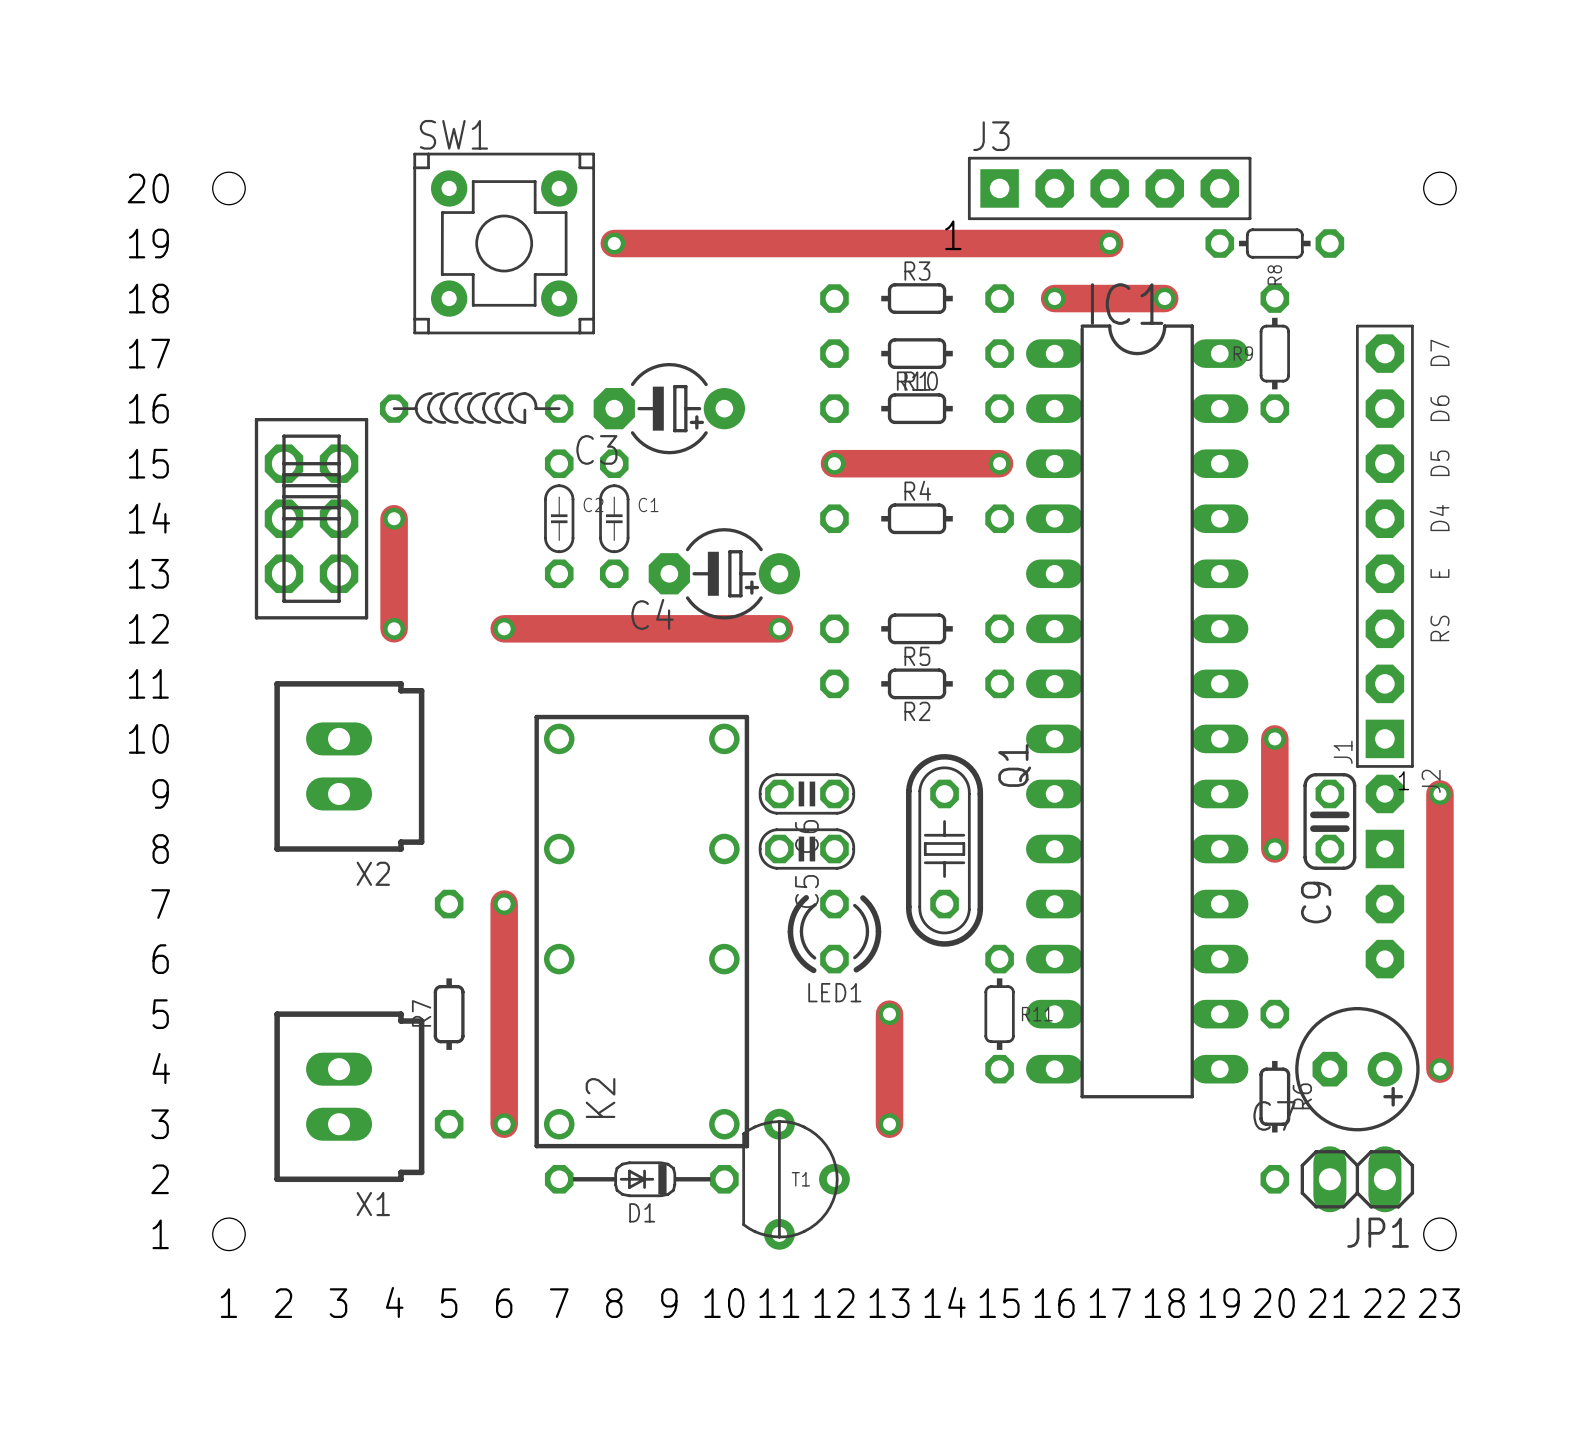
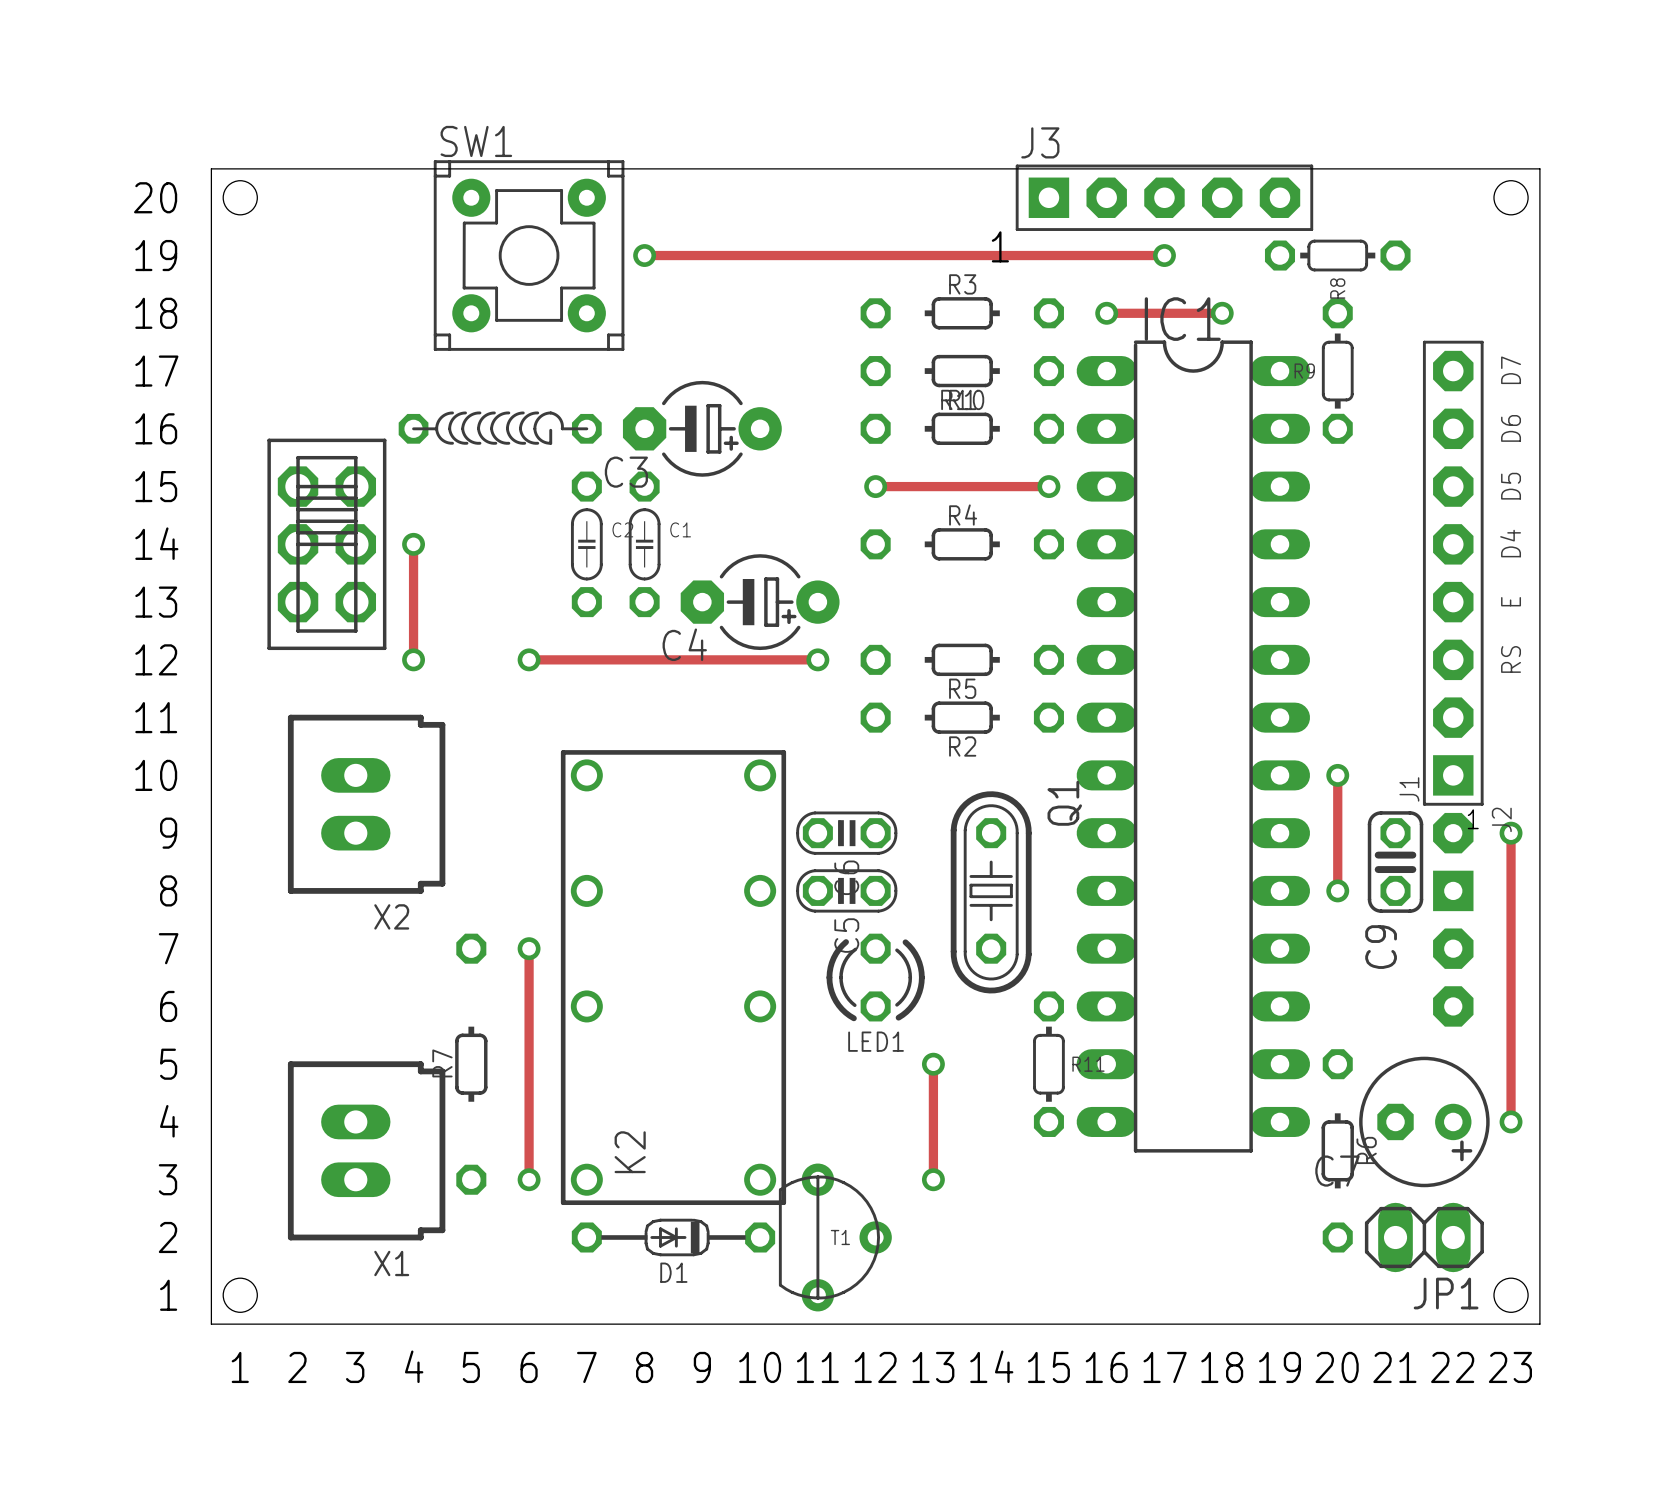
board edge: none -> (211, 168) (1539, 168) (1539, 1324) (211, 1324) (211, 168)
track width: thick (614, 243) (1109, 243) -> thin (644, 255) (1164, 255)
track width: thick (1054, 298) (1164, 298) -> thin (1106, 313) (1222, 313)
track width: thick (834, 463) (999, 463) -> thin (875, 486) (1048, 486)
track width: thick (394, 518) (394, 628) -> thin (413, 544) (413, 659)
track width: thick (504, 628) (779, 628) -> thin (529, 659) (817, 659)
track width: thick (1274, 738) (1274, 849) -> thin (1337, 775) (1337, 890)
track width: thick (1439, 793) (1439, 1069) -> thin (1511, 833) (1511, 1121)
track width: thick (504, 904) (504, 1124) -> thin (529, 948) (529, 1179)
track width: thick (889, 1014) (889, 1124) -> thin (933, 1064) (933, 1179)

